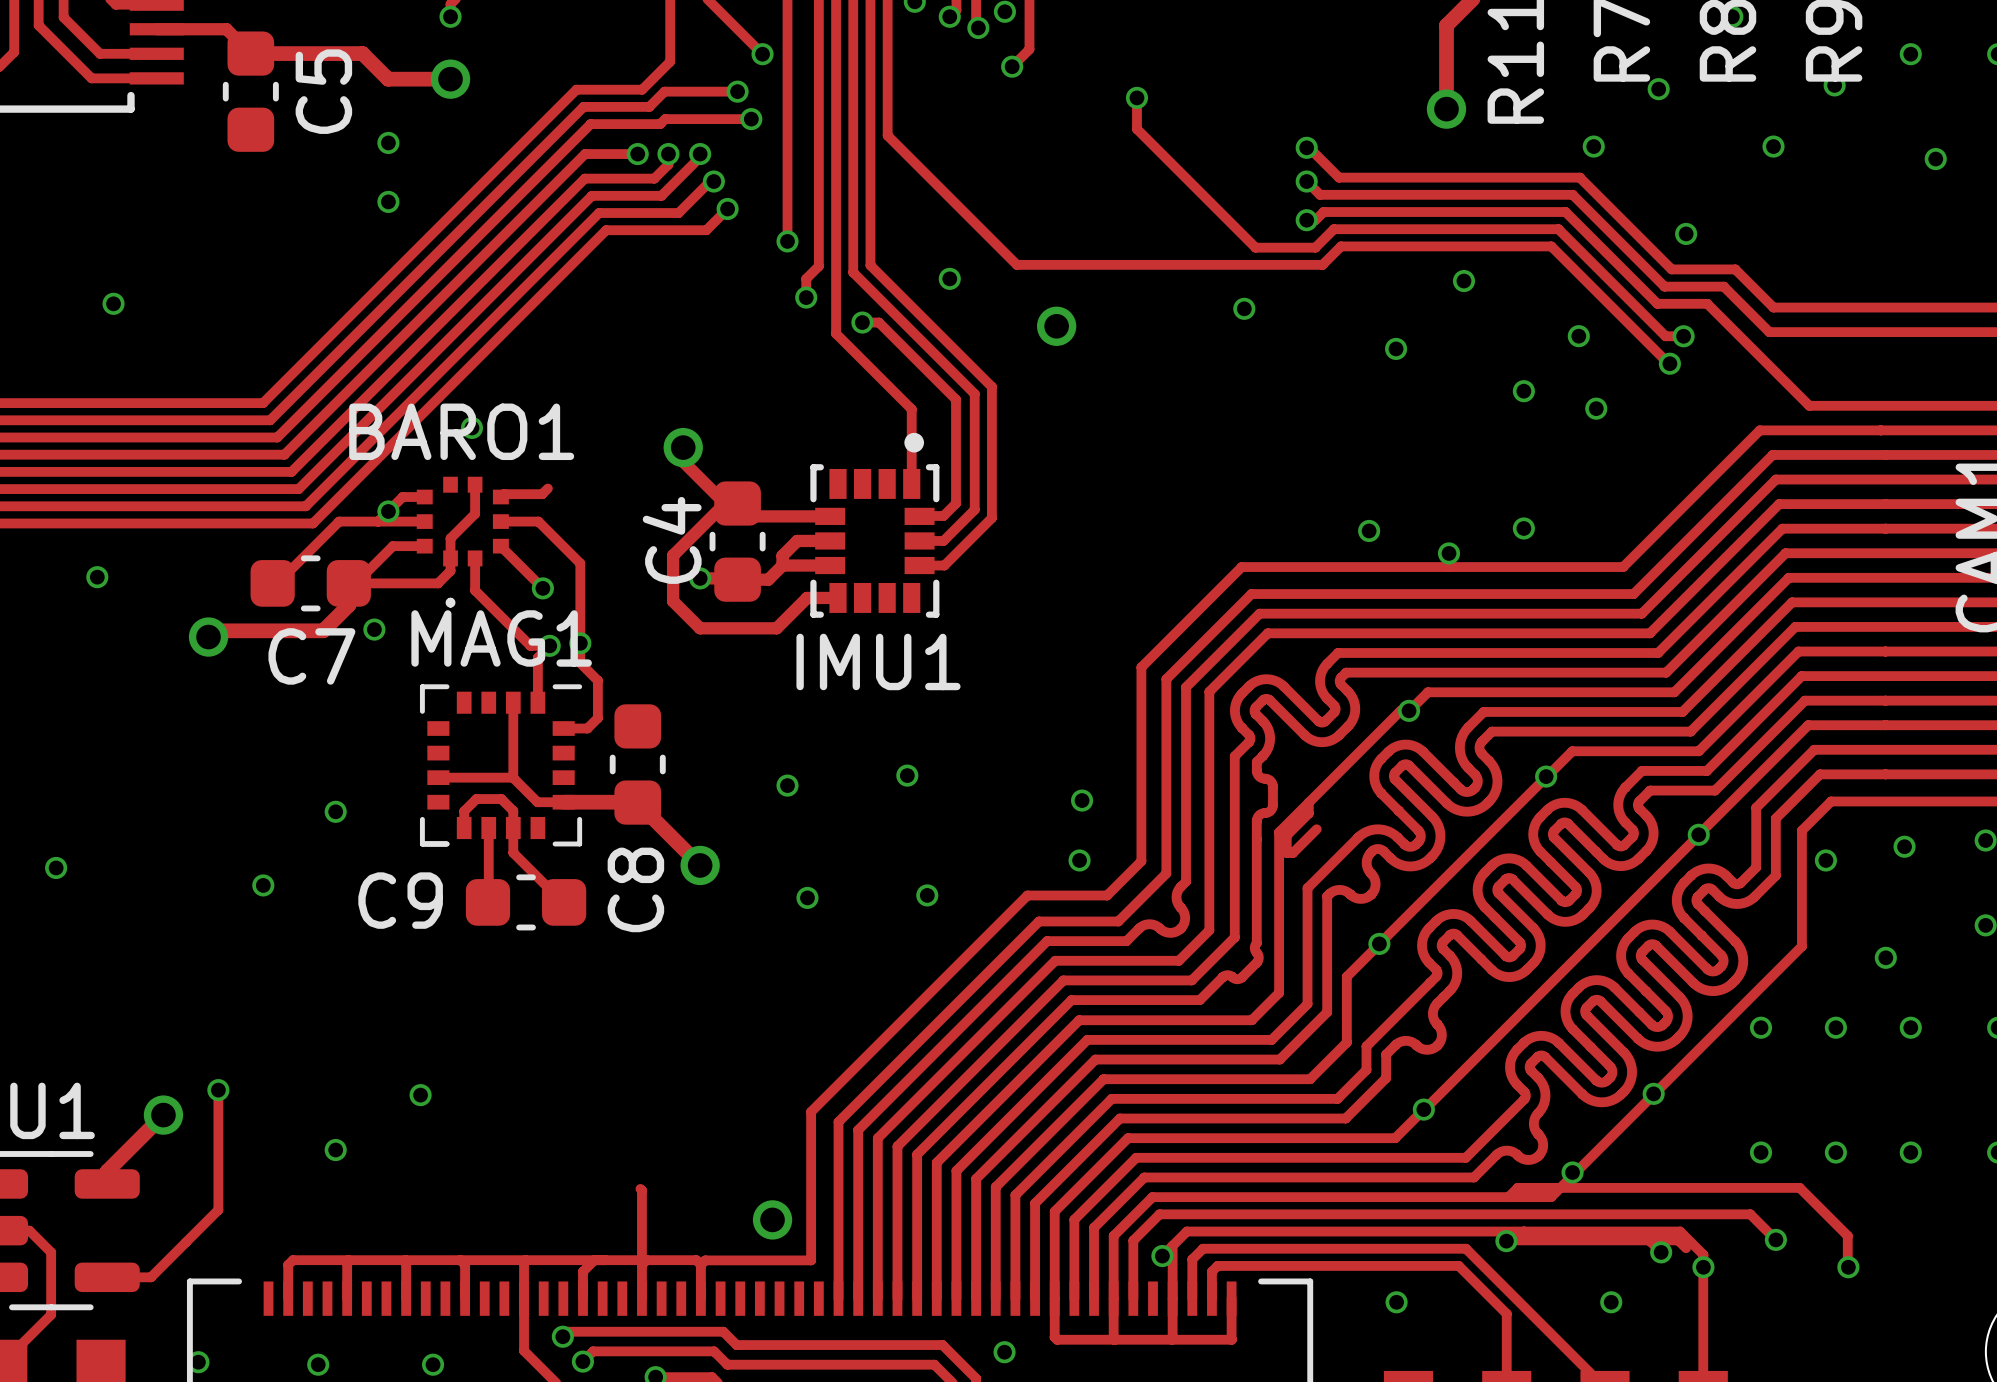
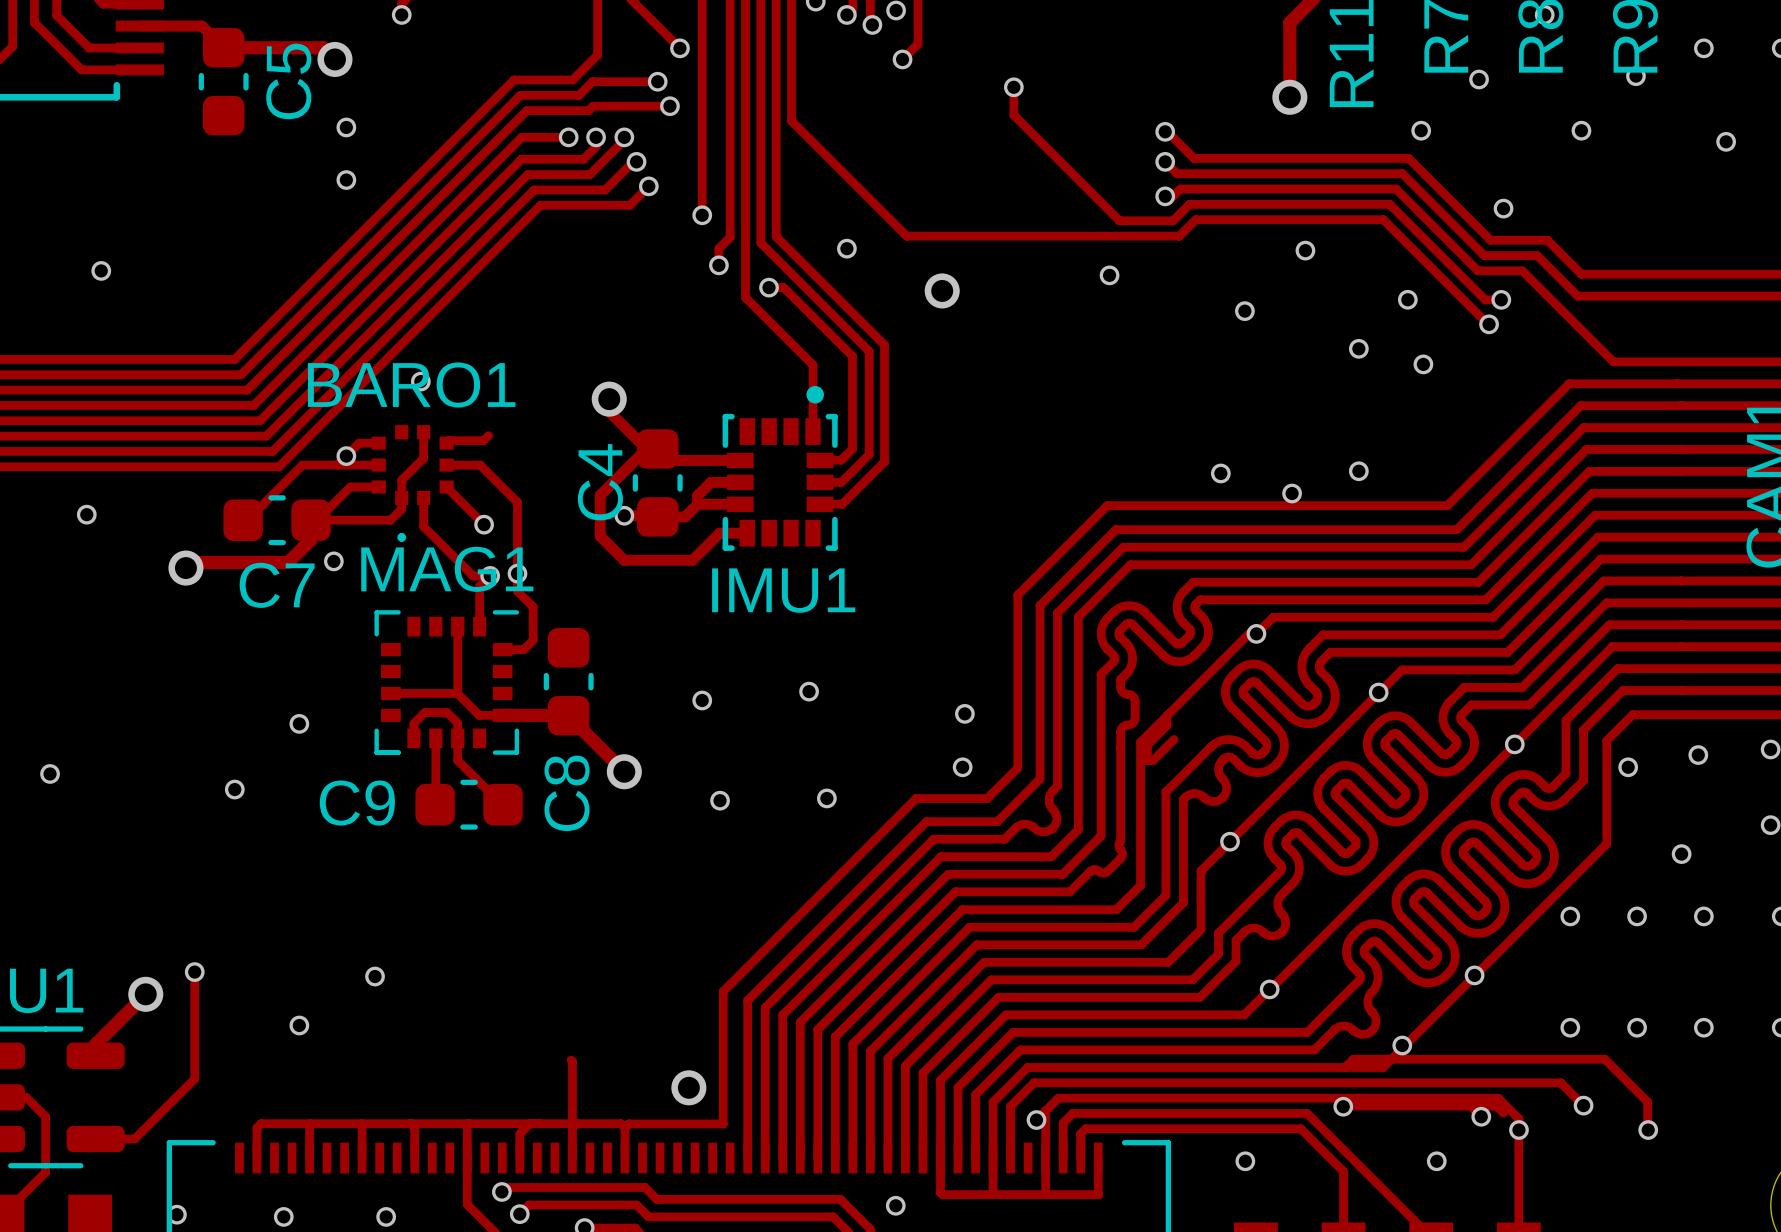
track: (375, 66) (388, 79) (450, 79) -> none
via position: (450, 79) -> (334, 59)

